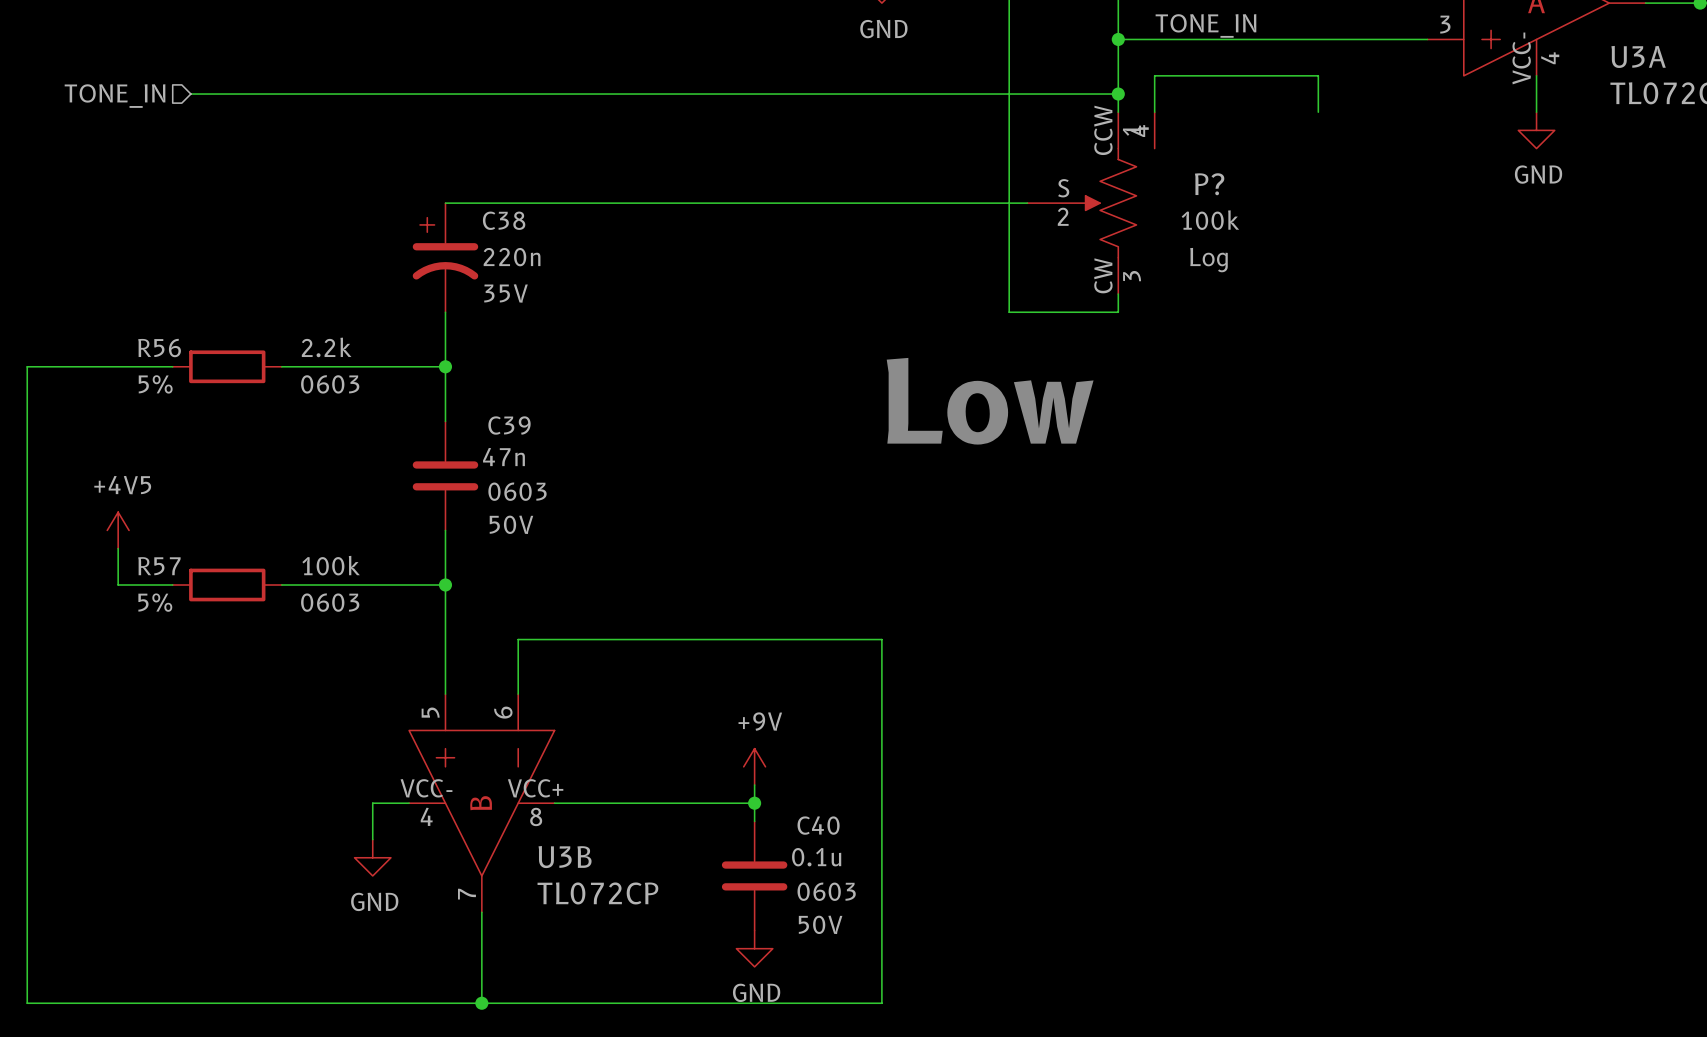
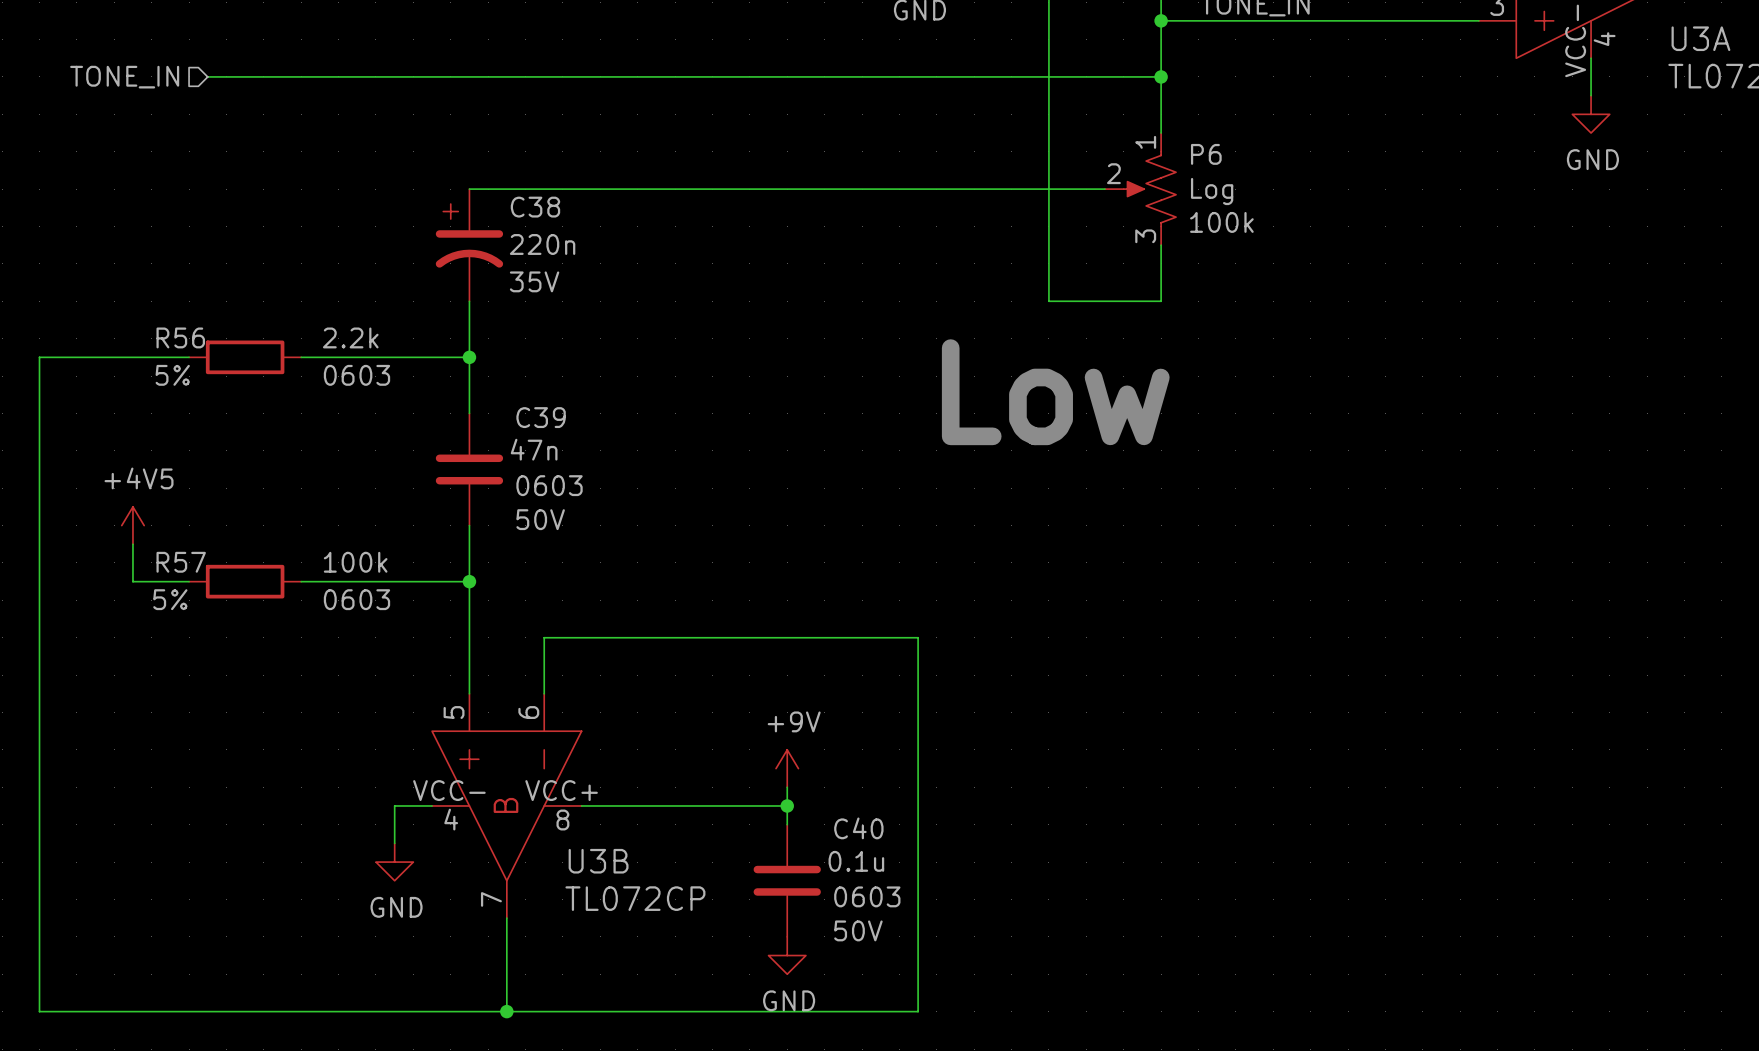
wire: (1154, 112) (1154, 75) (1318, 75) (1318, 112) -> none
P?: (1091, 203) -> none
P6: none -> (1140, 189)

